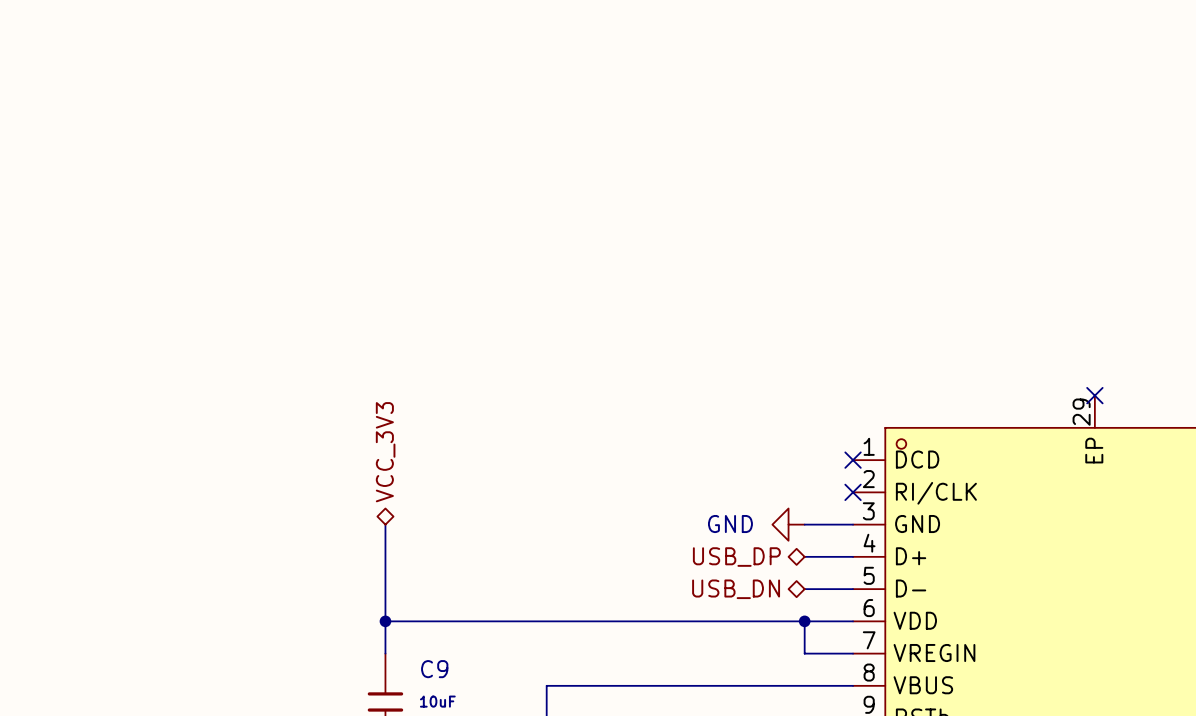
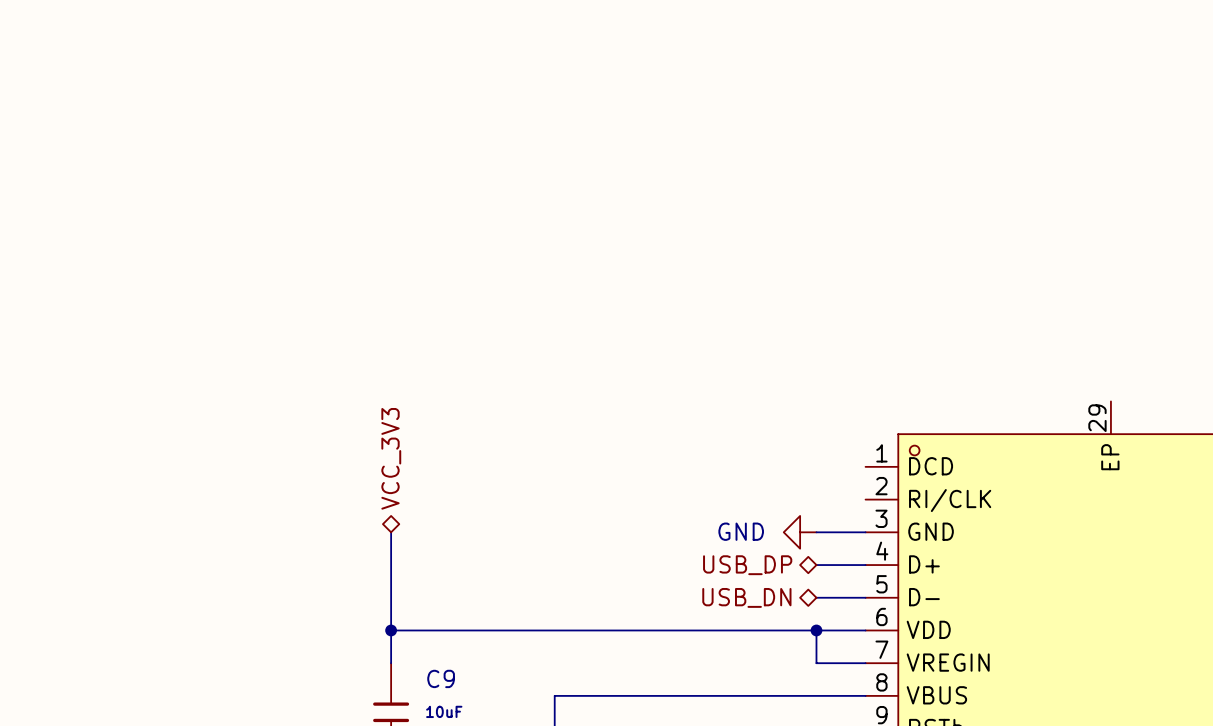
no-connect mark: (1094, 395) -> none
no-connect mark: (853, 460) -> none
no-connect mark: (853, 492) -> none

